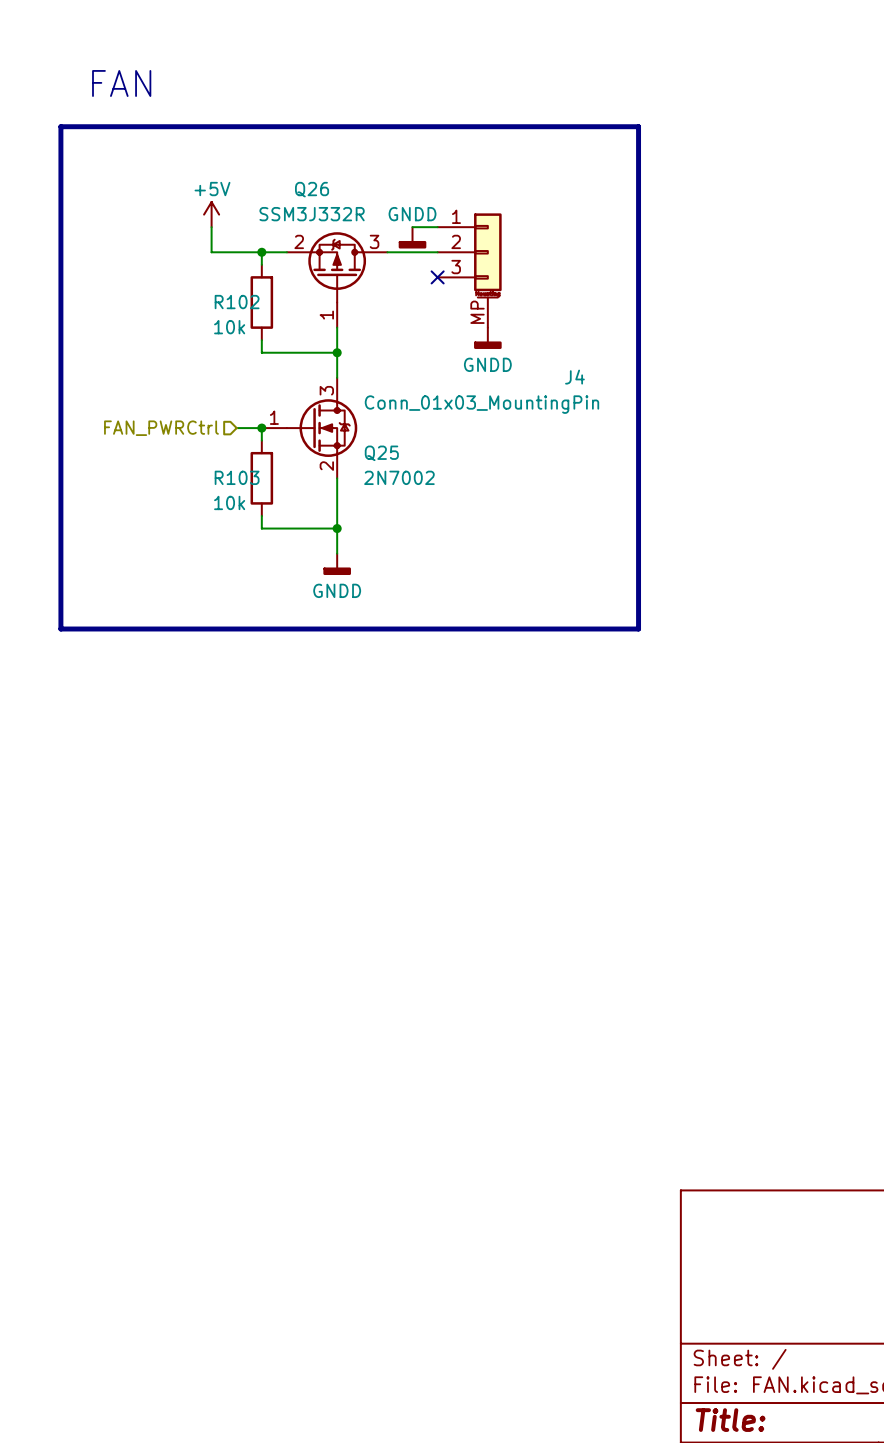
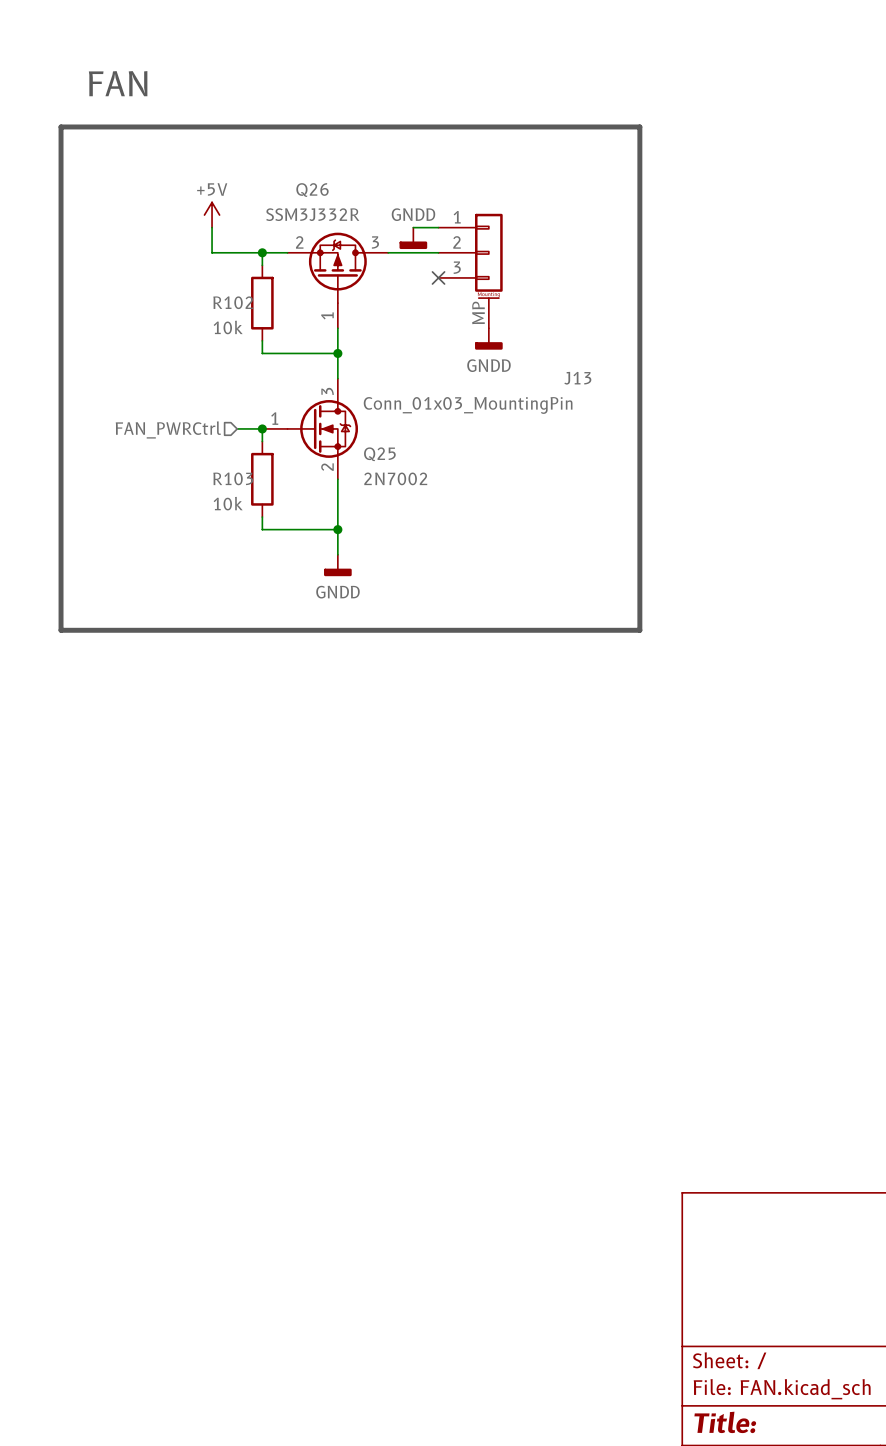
J4 name: J4 (574, 377) -> J13 (577, 378)

